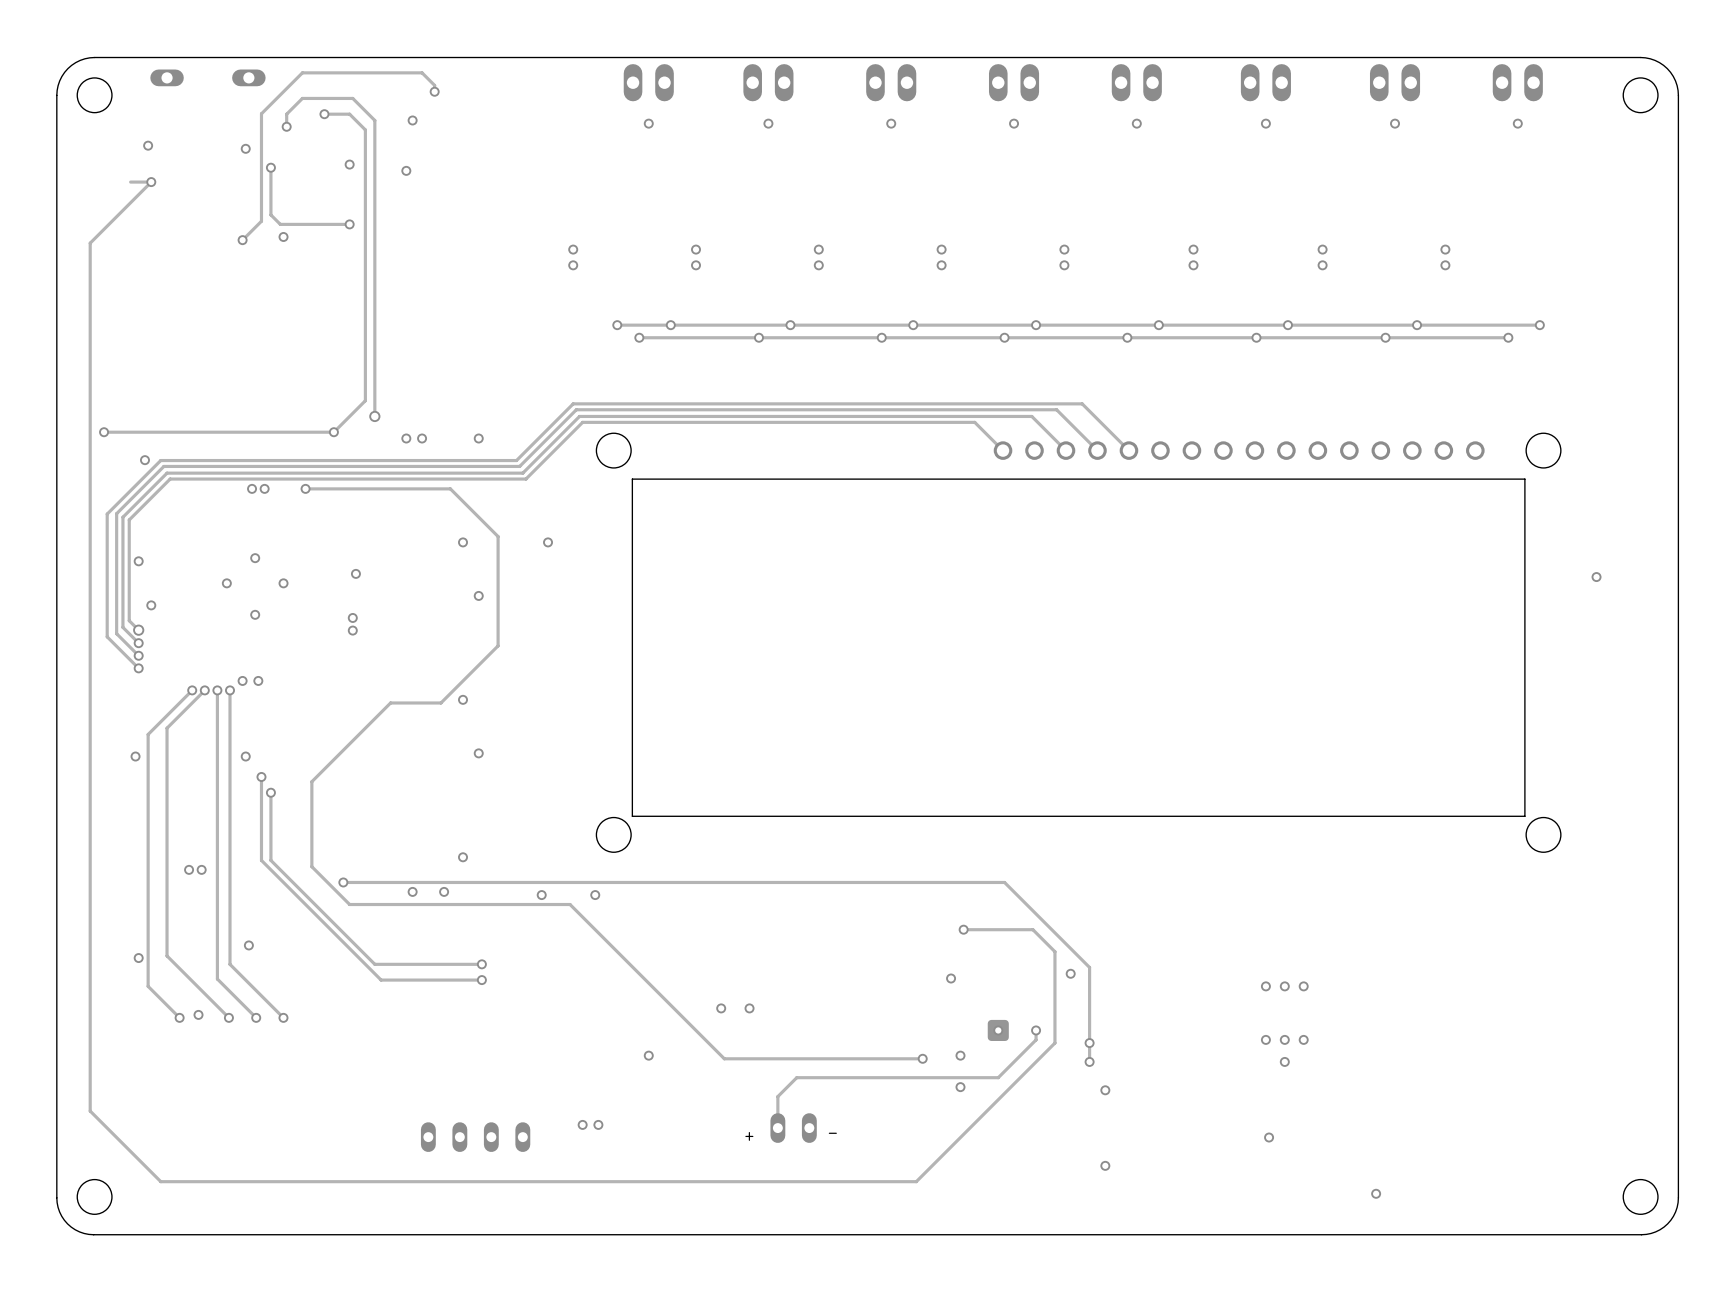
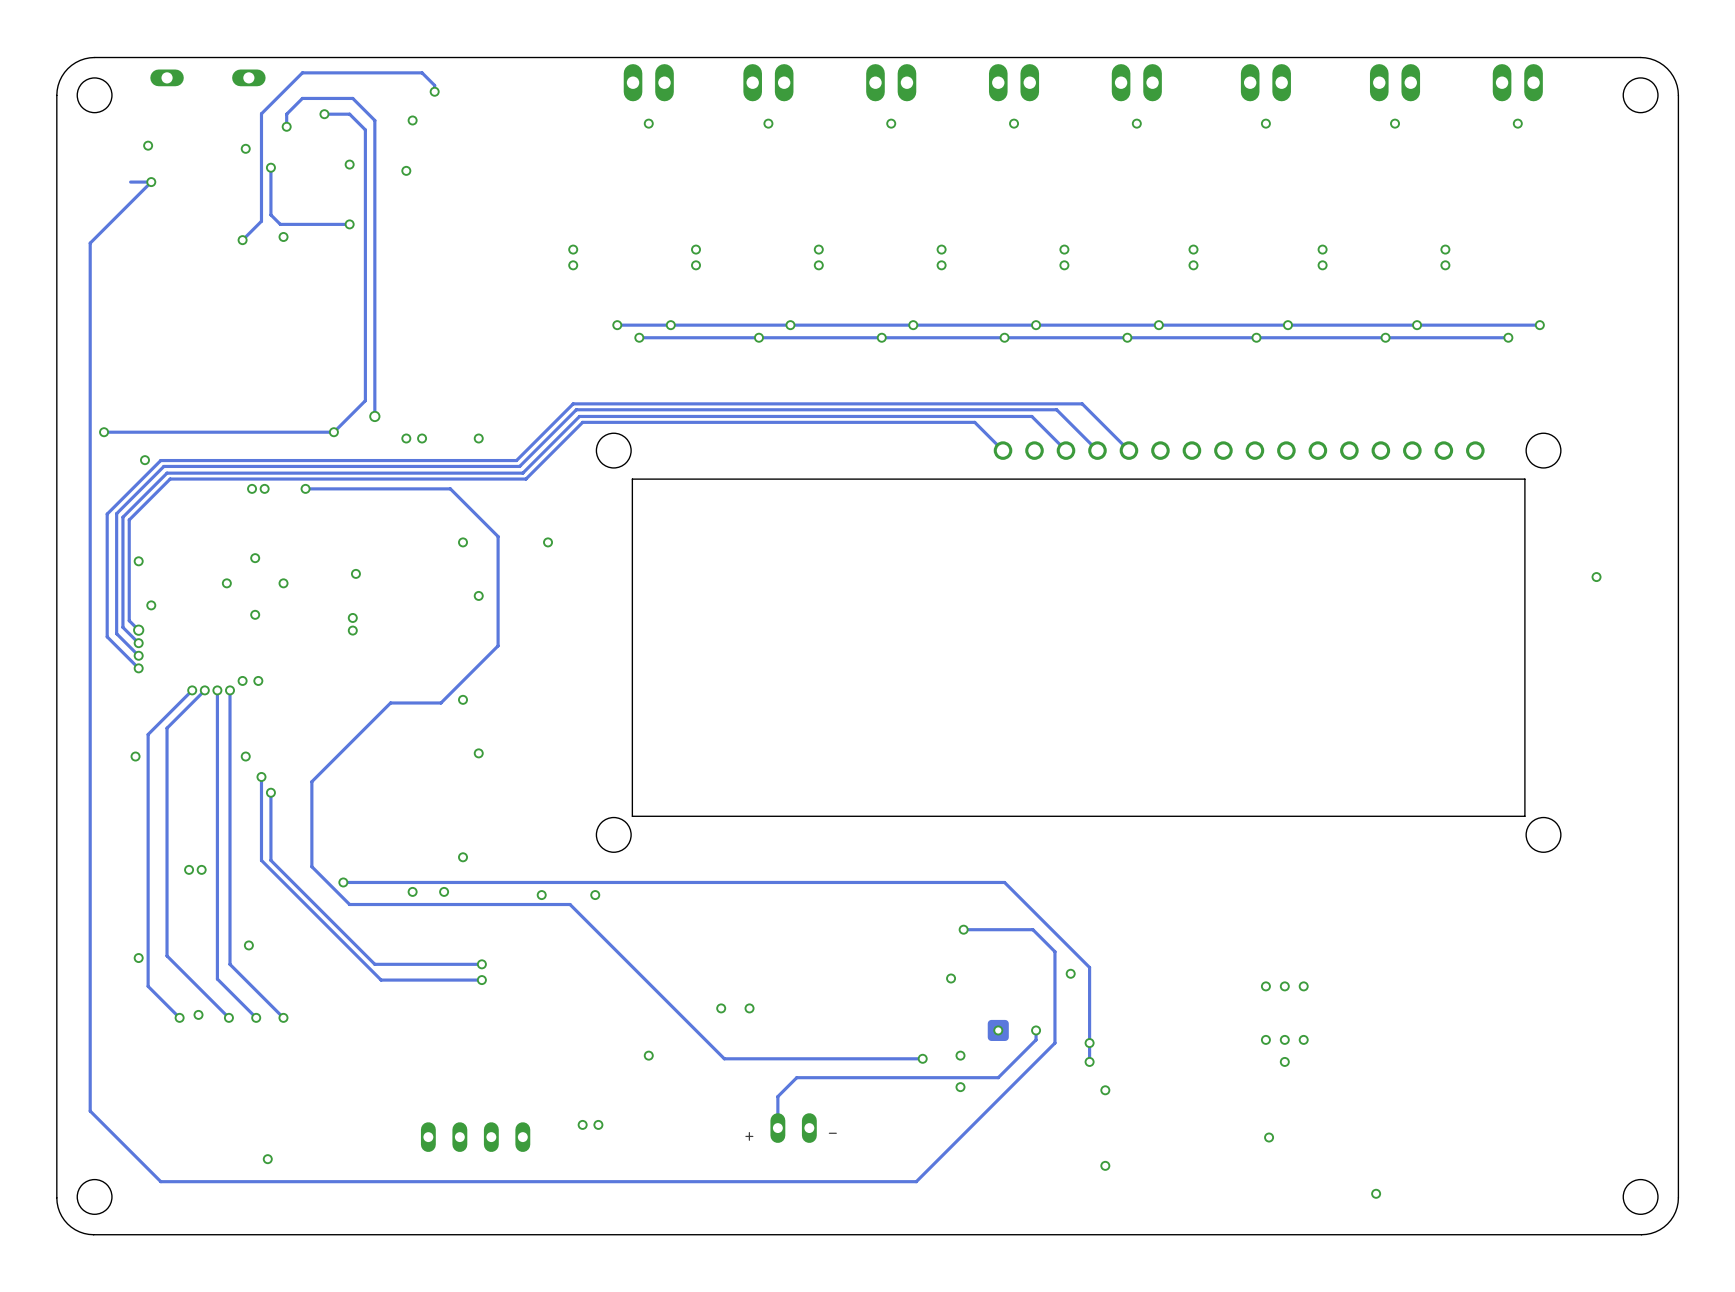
via: none -> (267, 1159)

